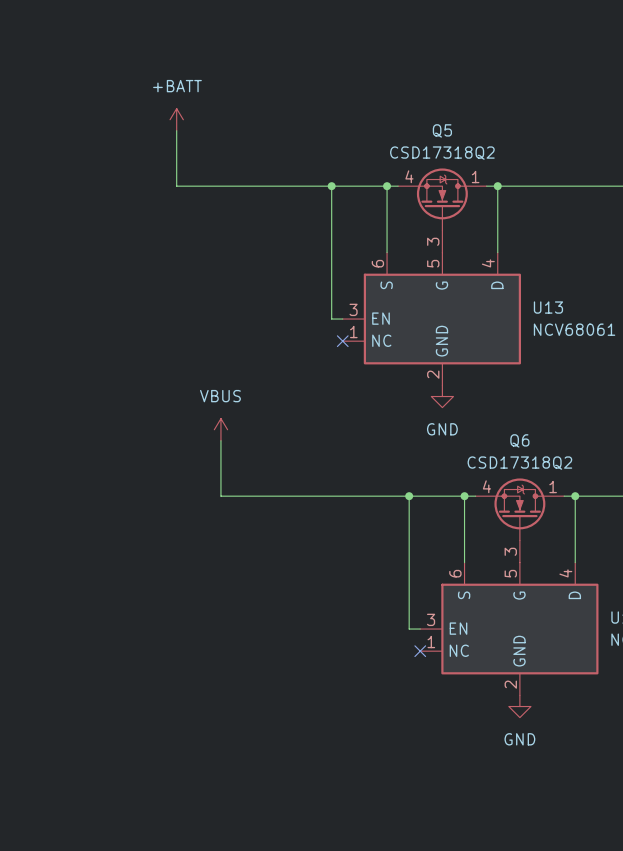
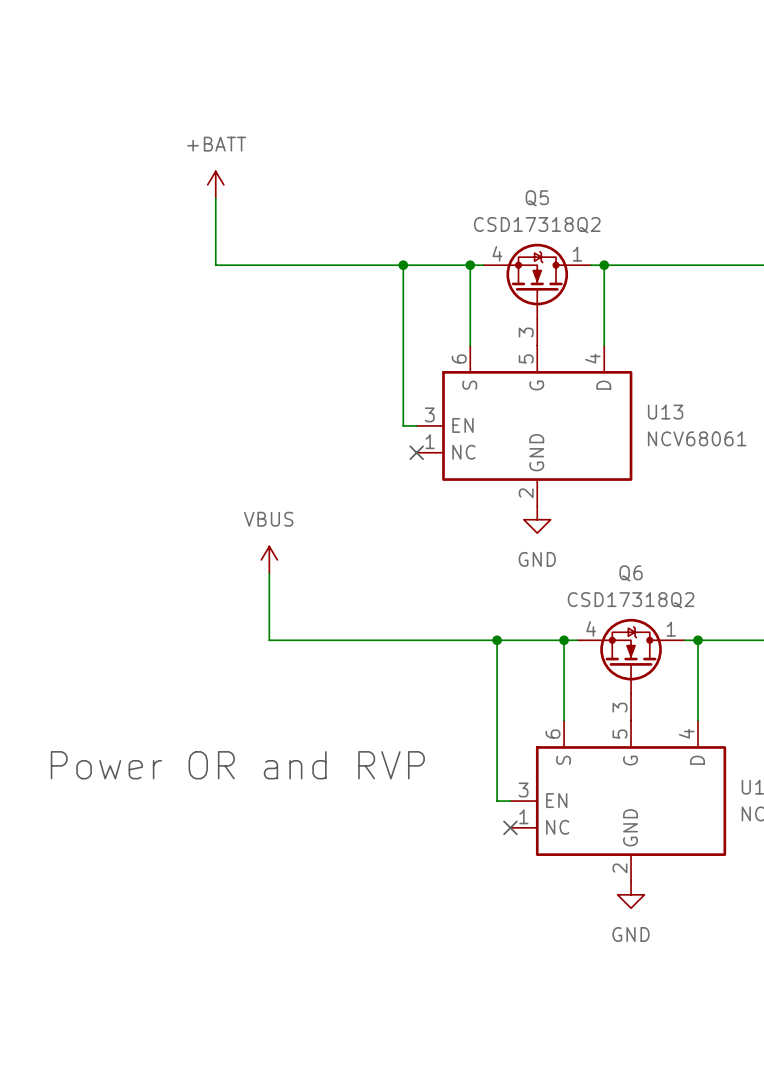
text: none -> Power OR and RVP (237, 765)

